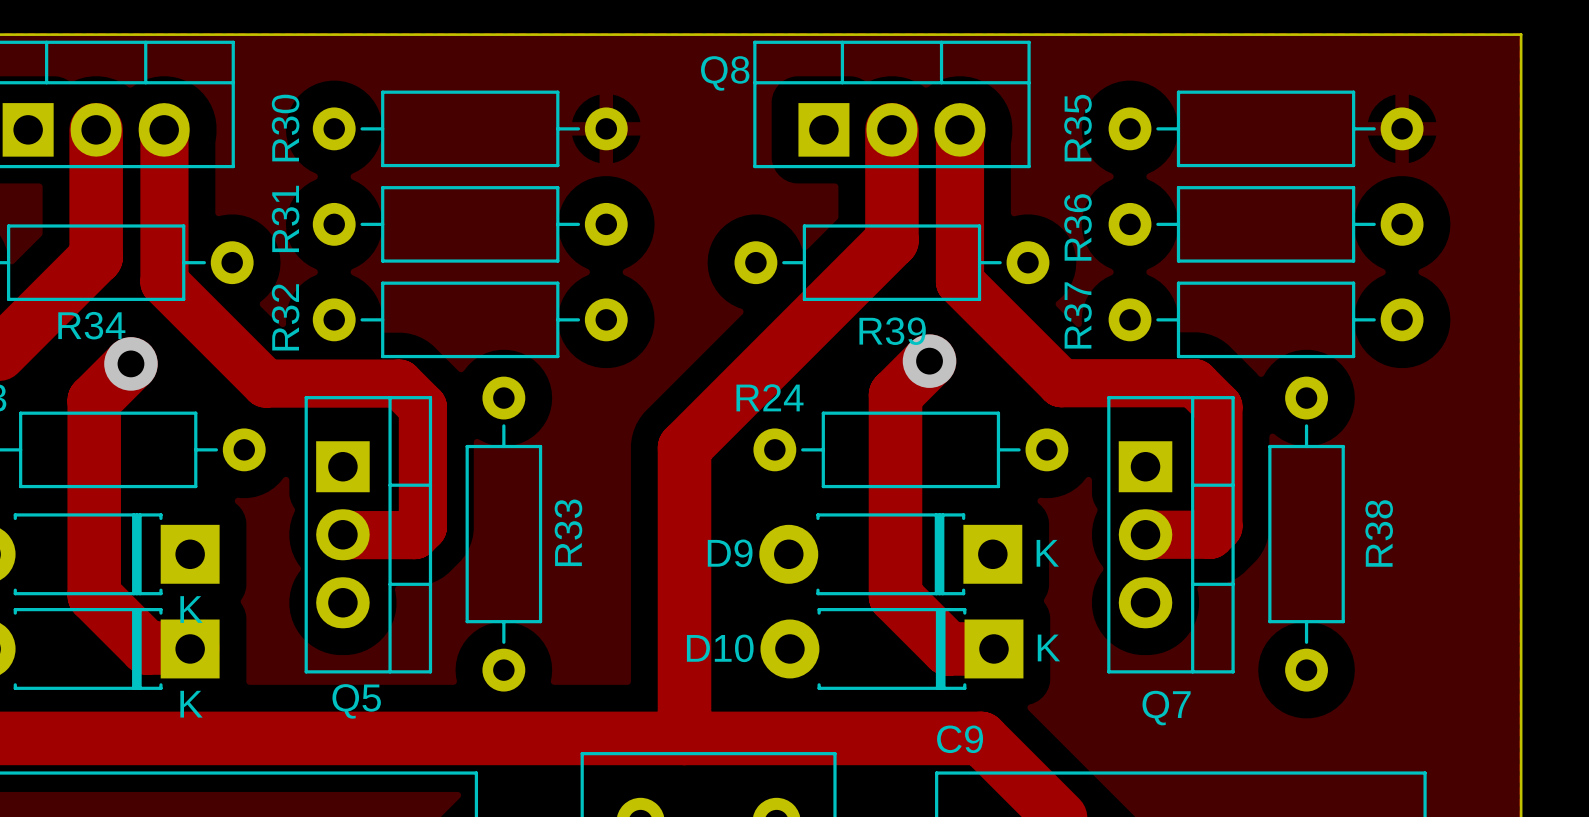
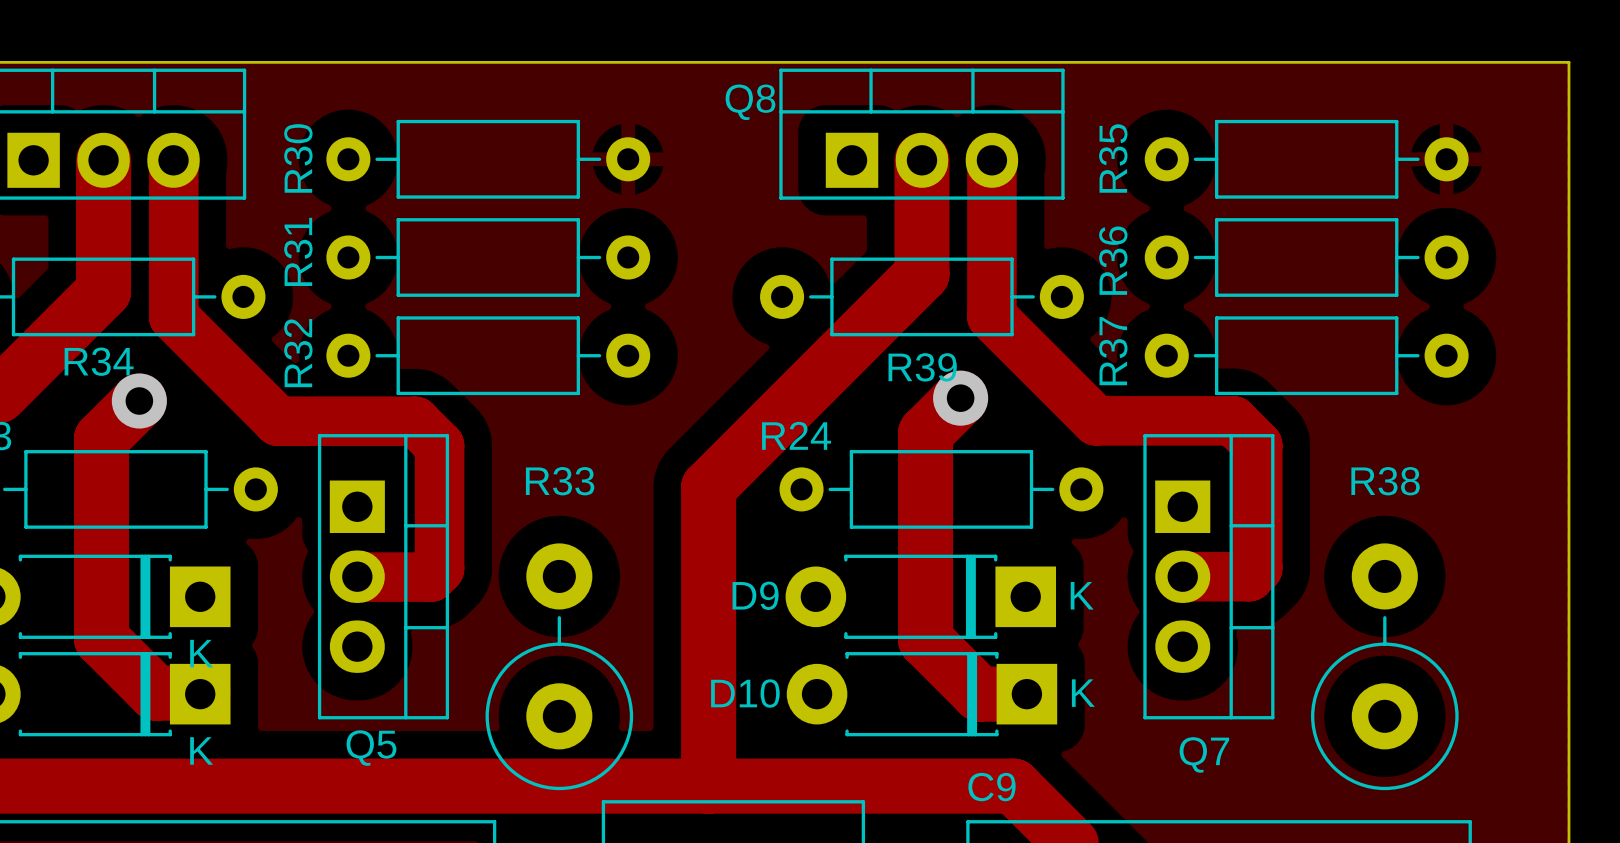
R33 footprint: [465, 376, 543, 692] -> [485, 543, 634, 791]
R38 footprint: [1268, 376, 1345, 692] -> [1311, 543, 1459, 791]
R33 name position: R33 (568, 532) -> R33 (560, 481)
R38 name position: R38 (1379, 533) -> R38 (1385, 481)

